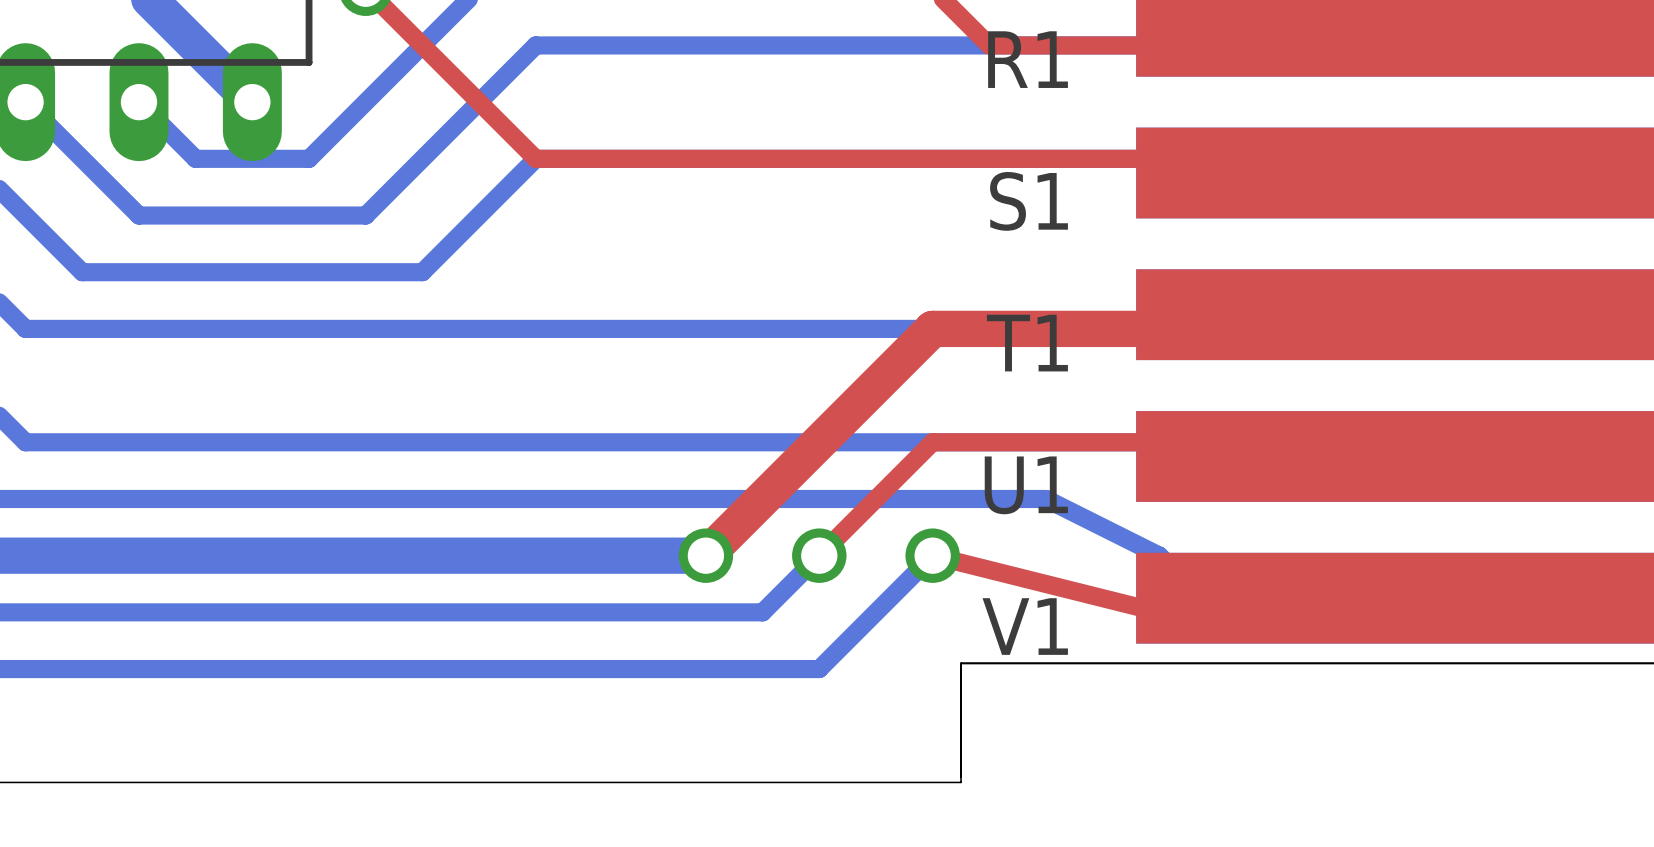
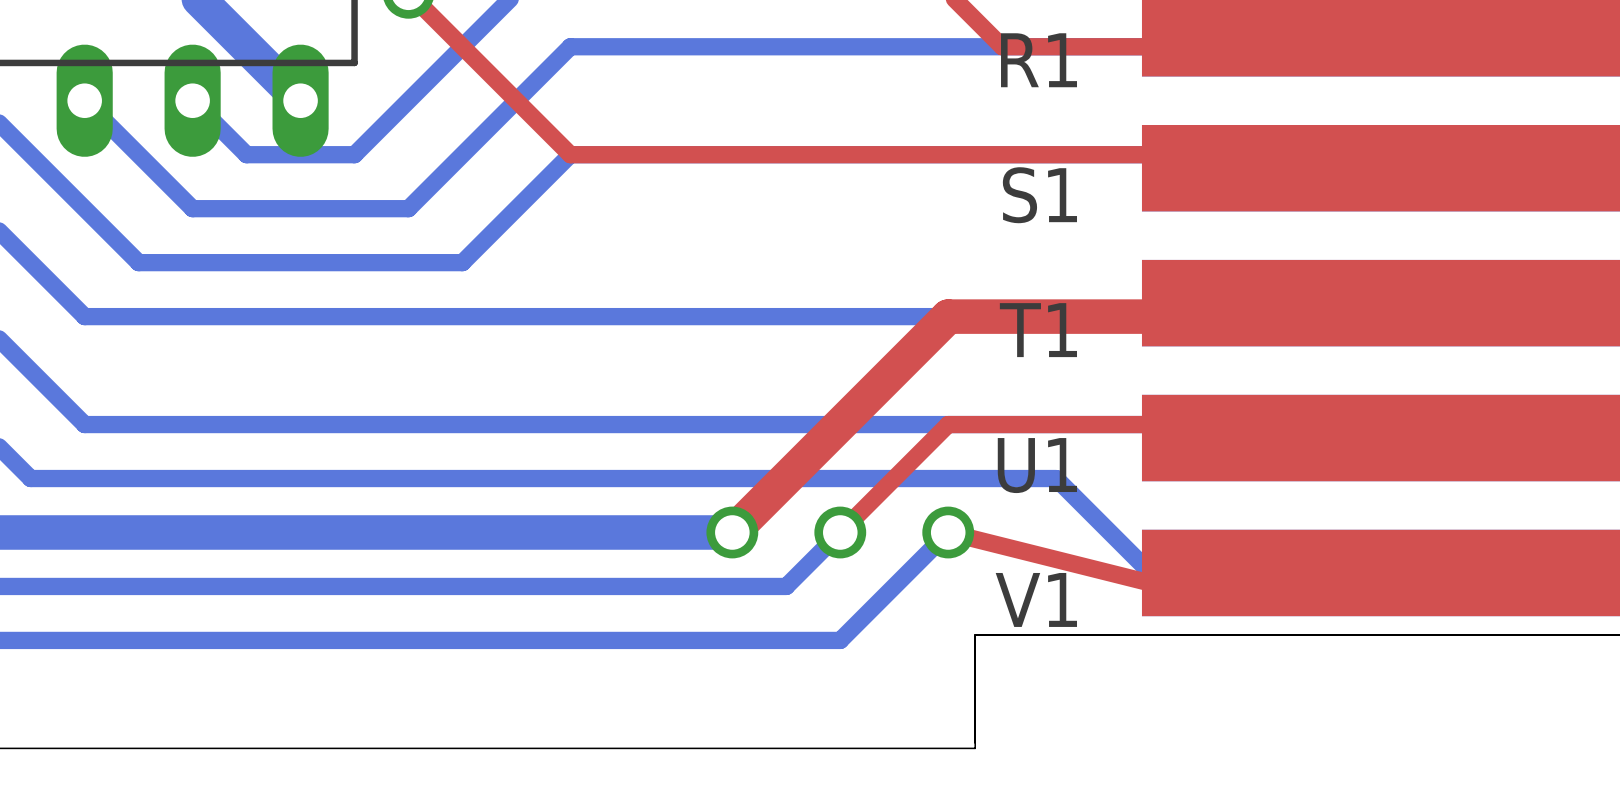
bottom track: (1046, 498) (1159, 555) (1198, 594) -> (1056, 478) (1164, 586) (1201, 569)

